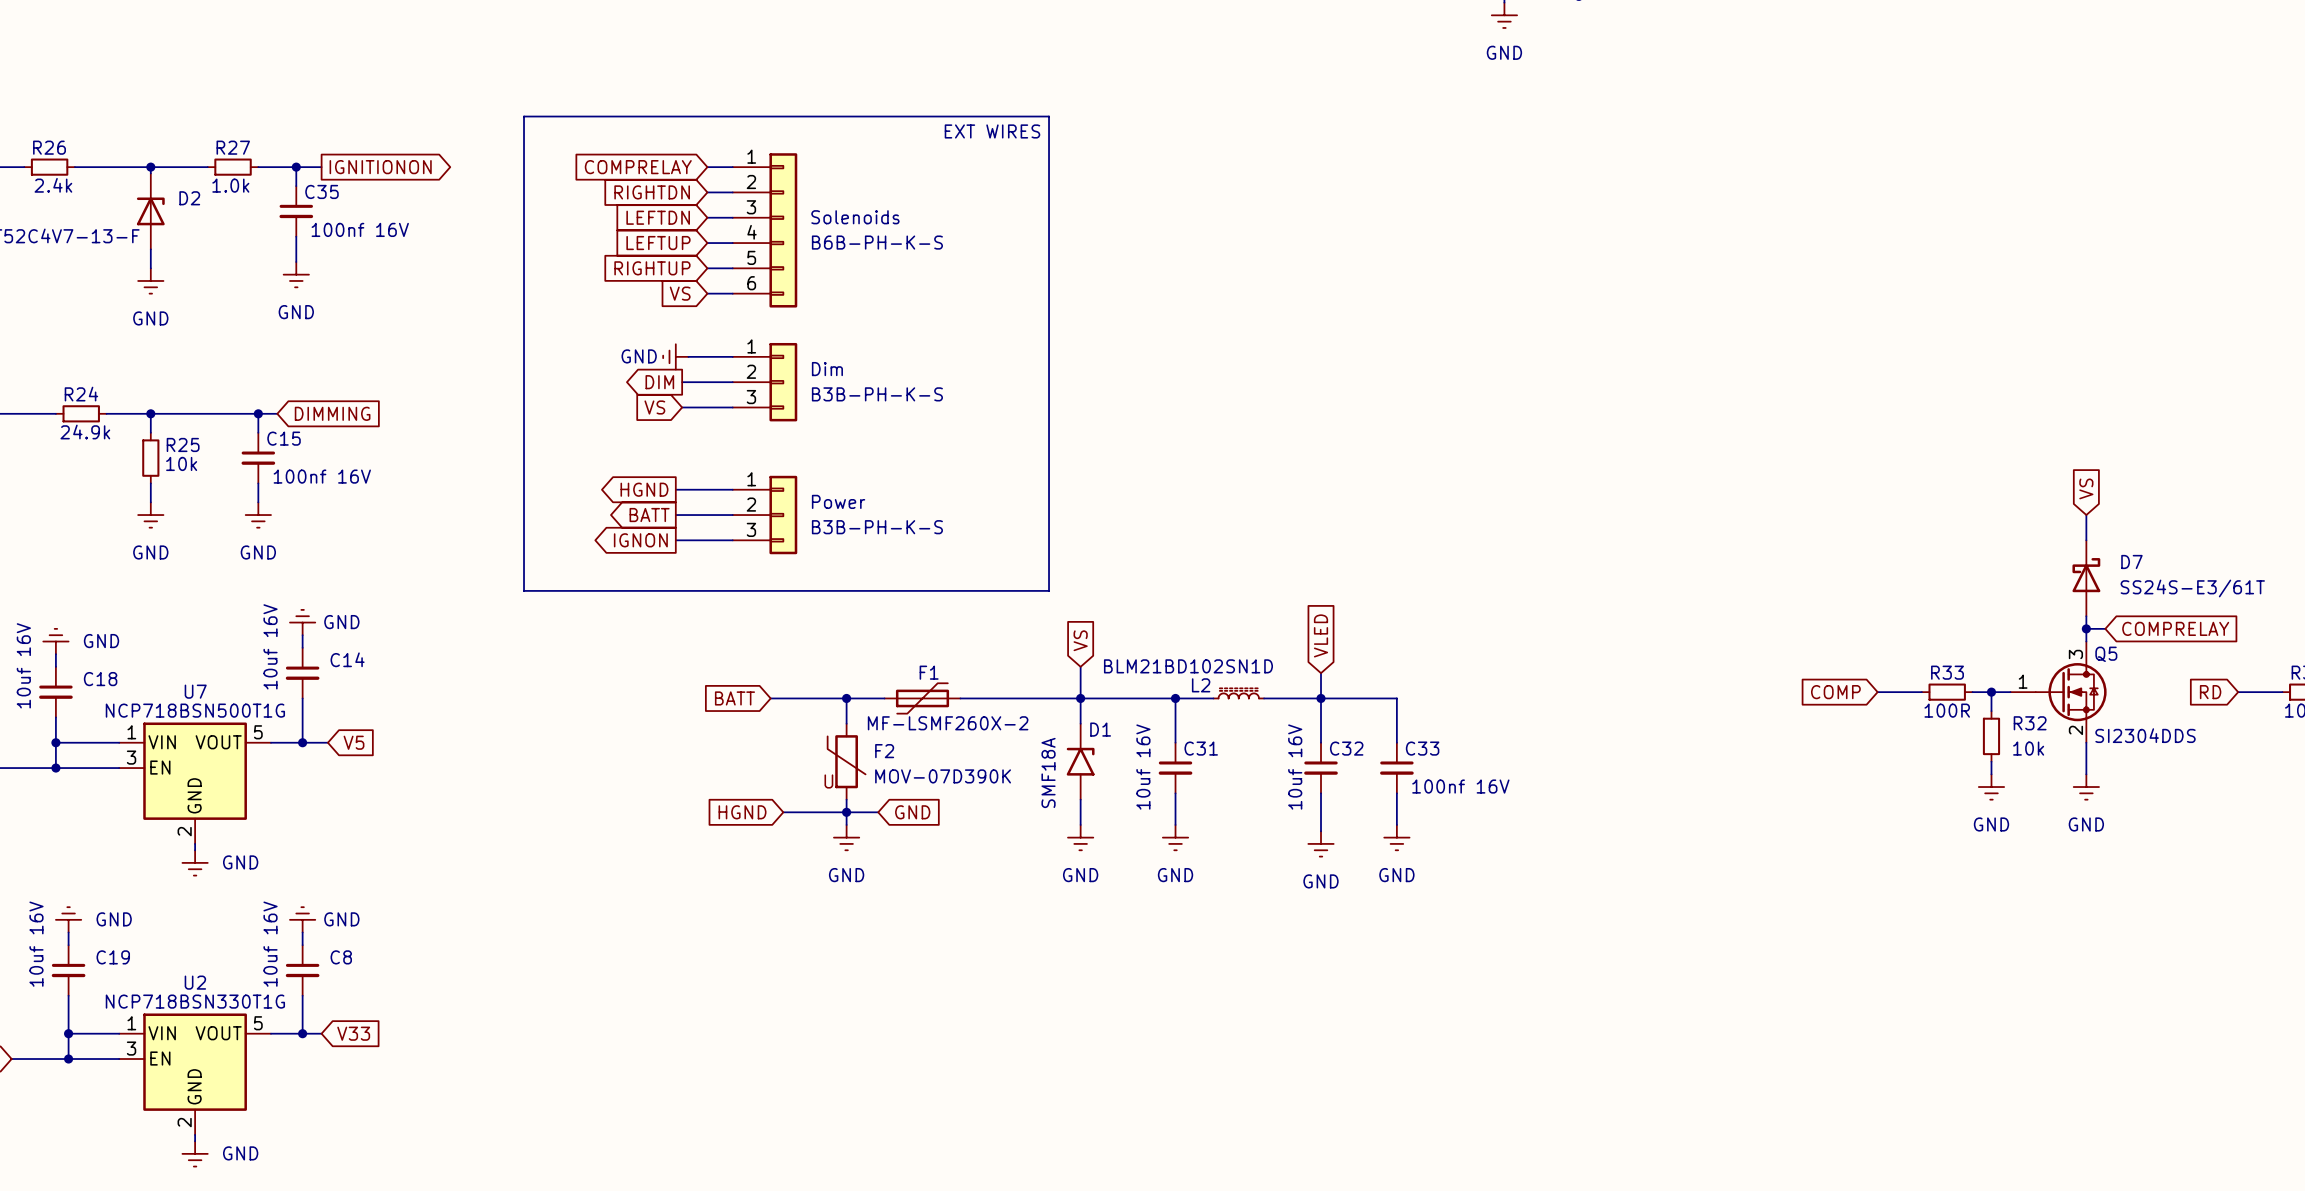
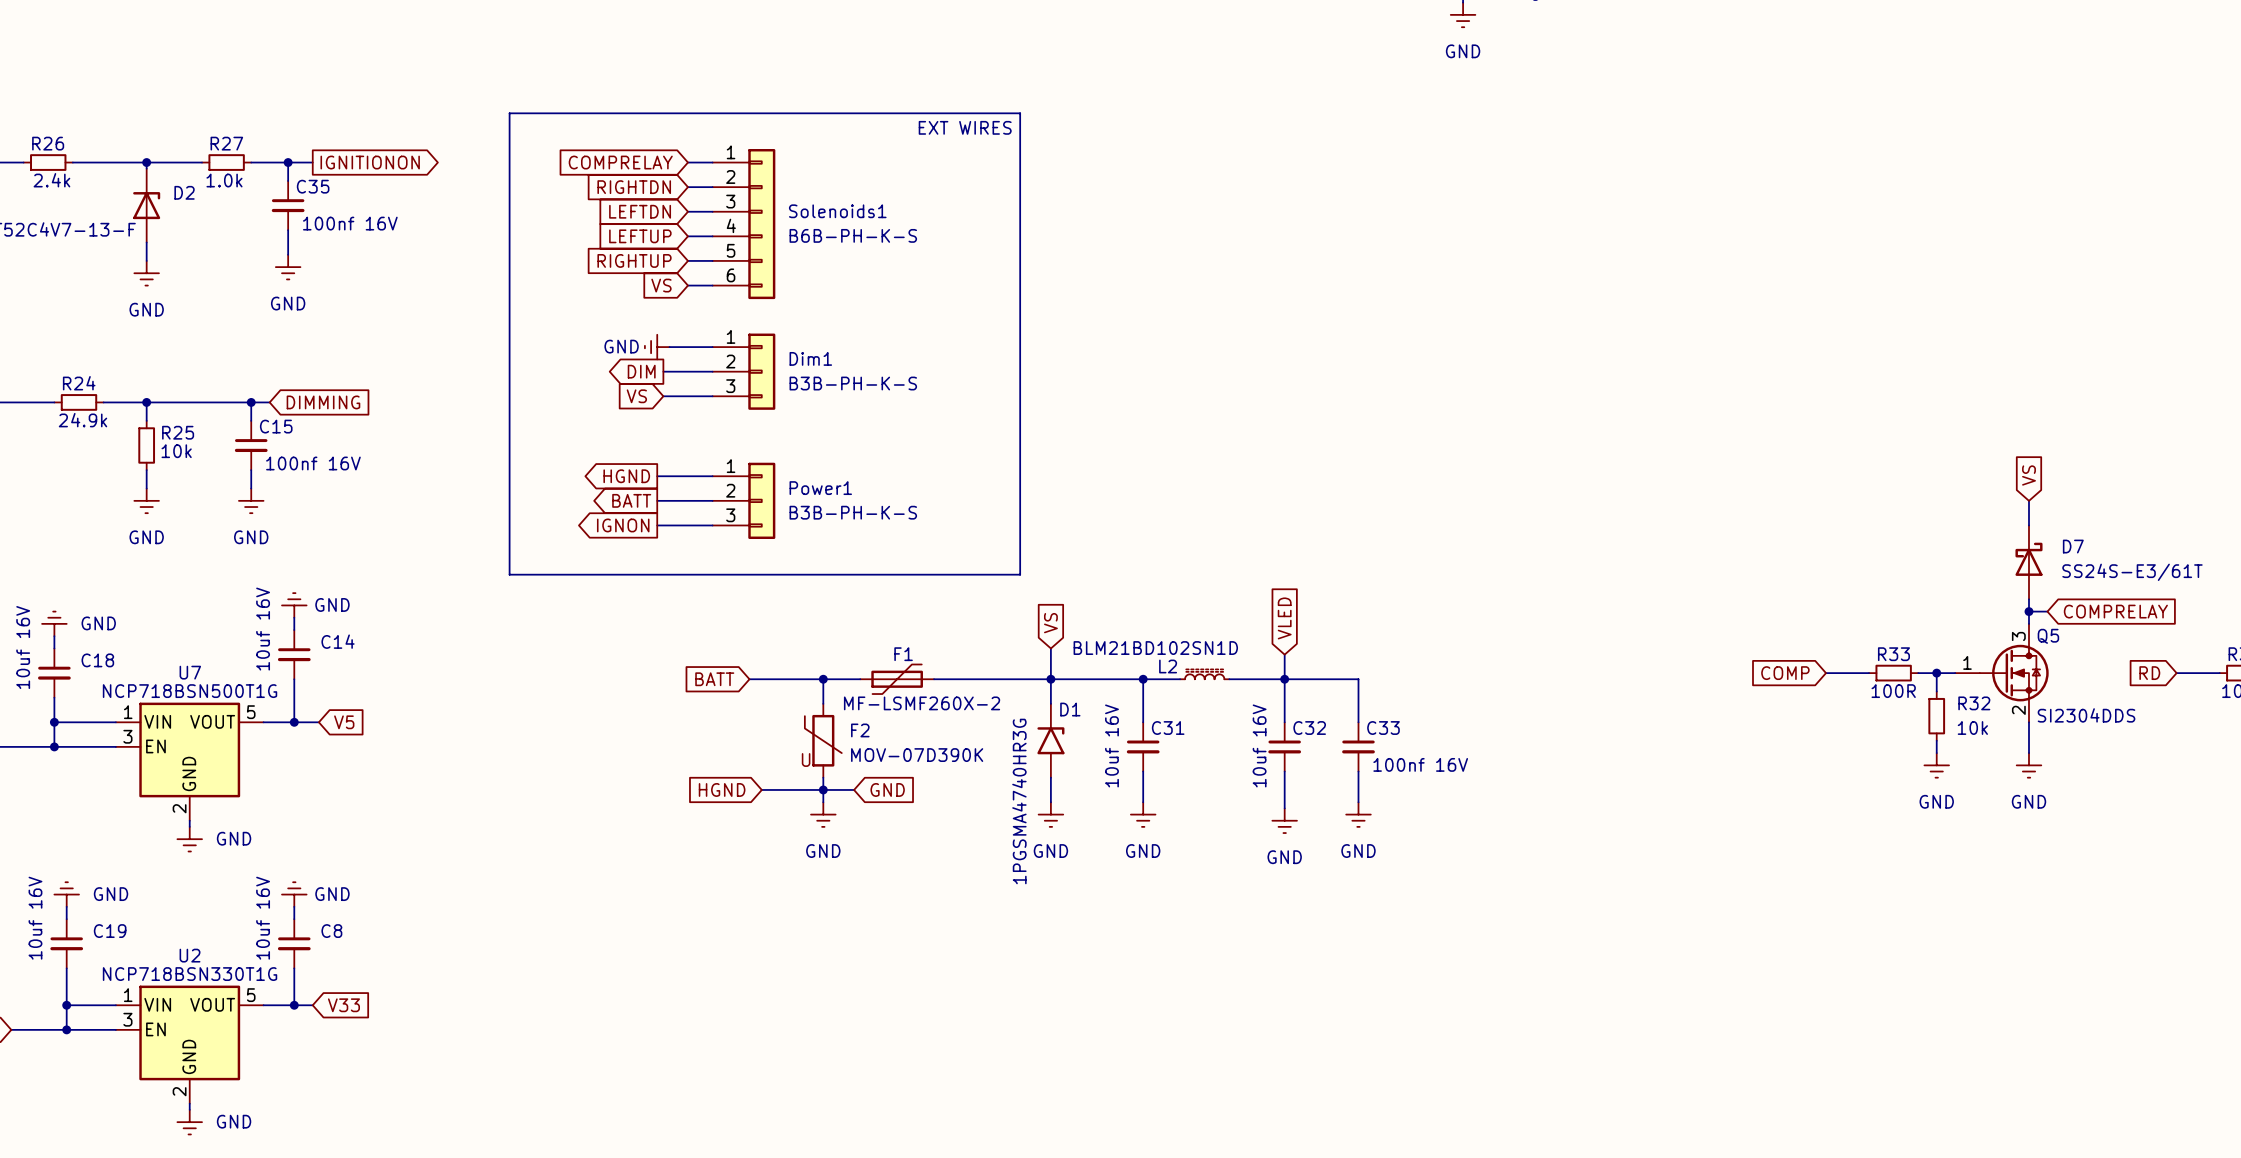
Solenoids name: Solenoids (855, 217) -> Solenoids1 (837, 211)
Dim name: Dim (827, 369) -> Dim1 (810, 358)
Power name: Power (838, 501) -> Power1 (820, 488)
D1 value: SMF18A (1048, 772) -> 1PGSMA4740HR3G (1019, 801)

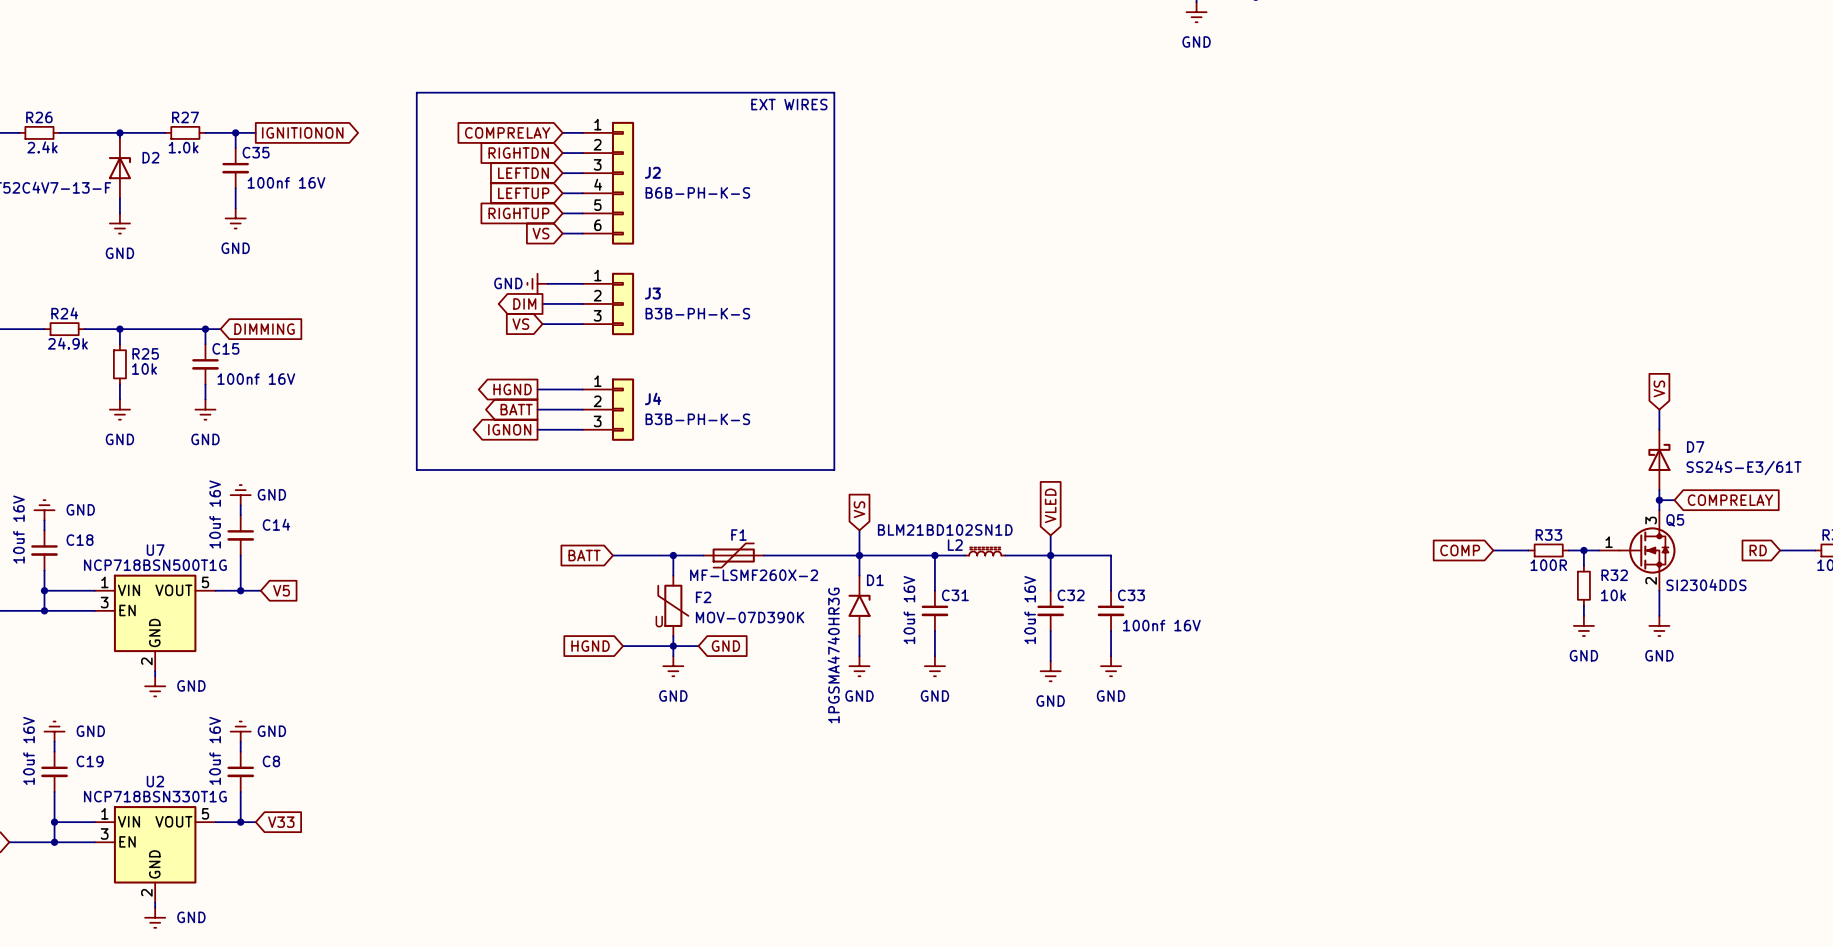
Solenoids1 name: Solenoids1 (837, 211) -> J2 (652, 172)
Dim1 name: Dim1 (810, 358) -> J3 (652, 293)
Power1 name: Power1 (820, 488) -> J4 (653, 398)

